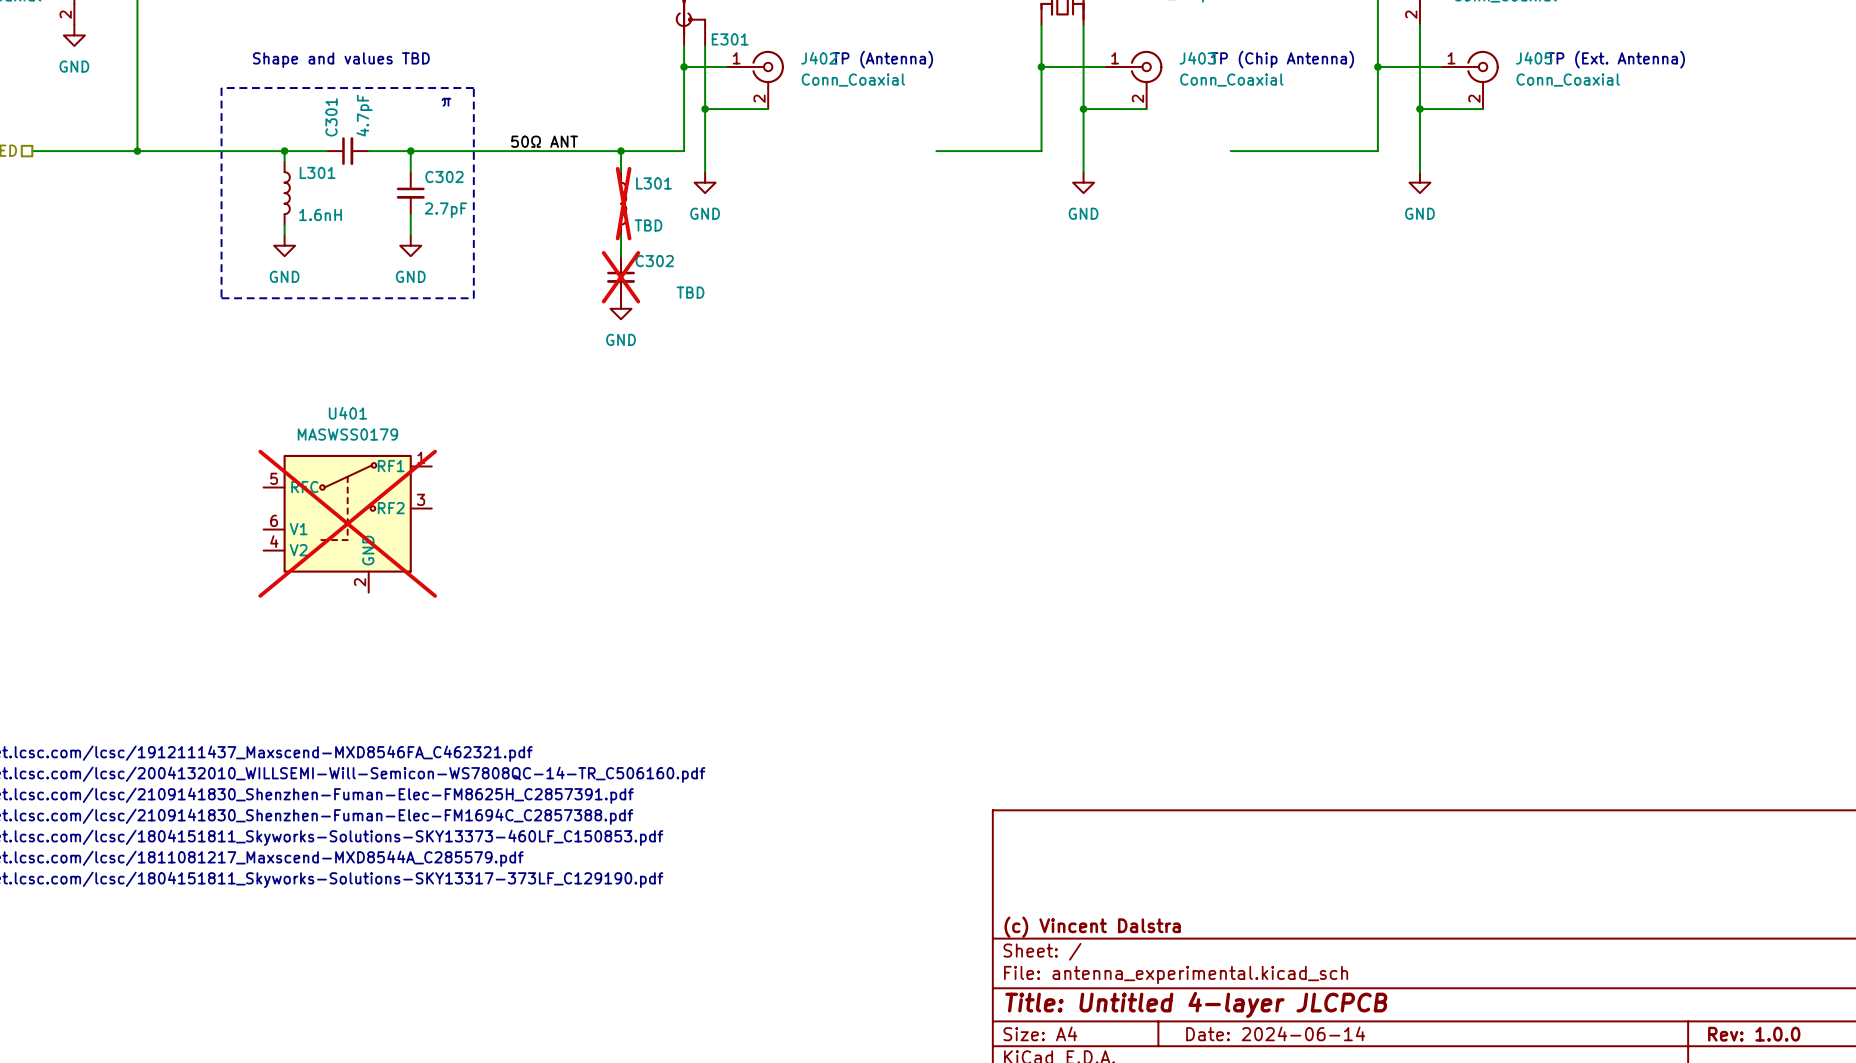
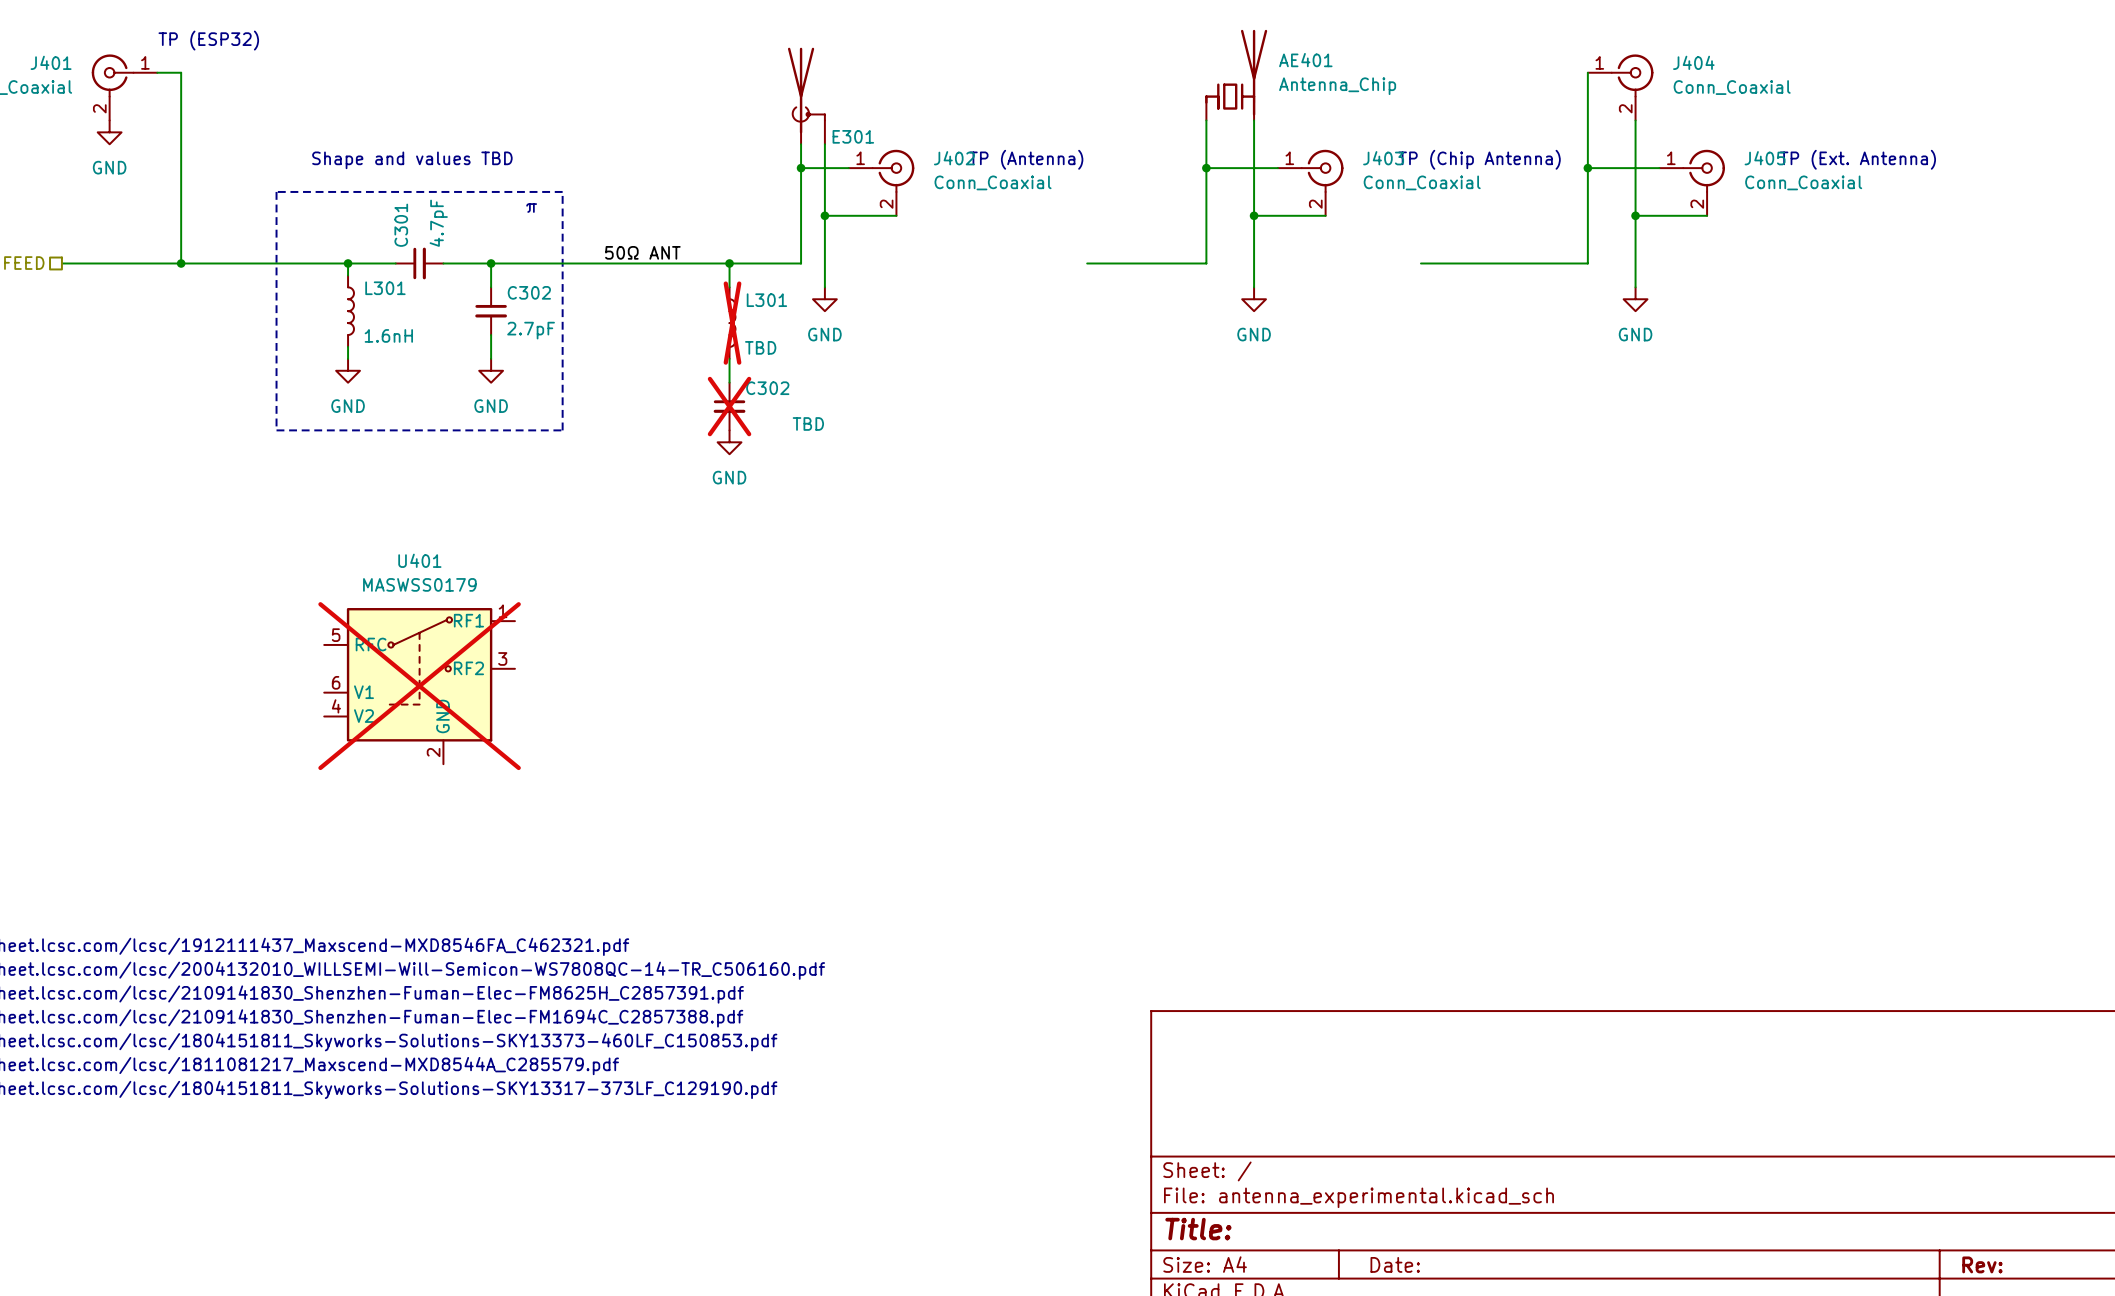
title block: (c) Vincent Dalstra (1092, 927) -> none
title block: Title: Untitled 4-layer JLCPCB (1196, 1004) -> Title: (1198, 1229)
title block: Date: 2024-06-14 (1275, 1033) -> Date: (1395, 1264)
title block: Rev: 1.0.0 (1754, 1034) -> Rev: (1982, 1264)

